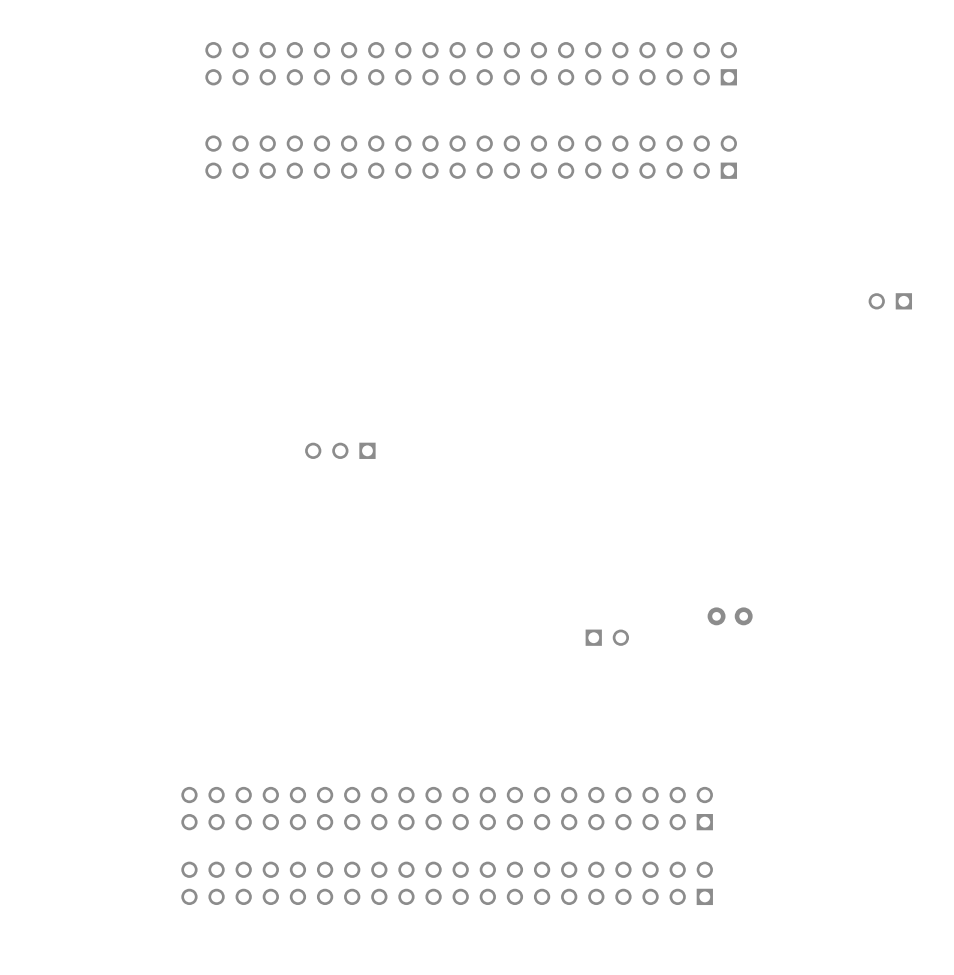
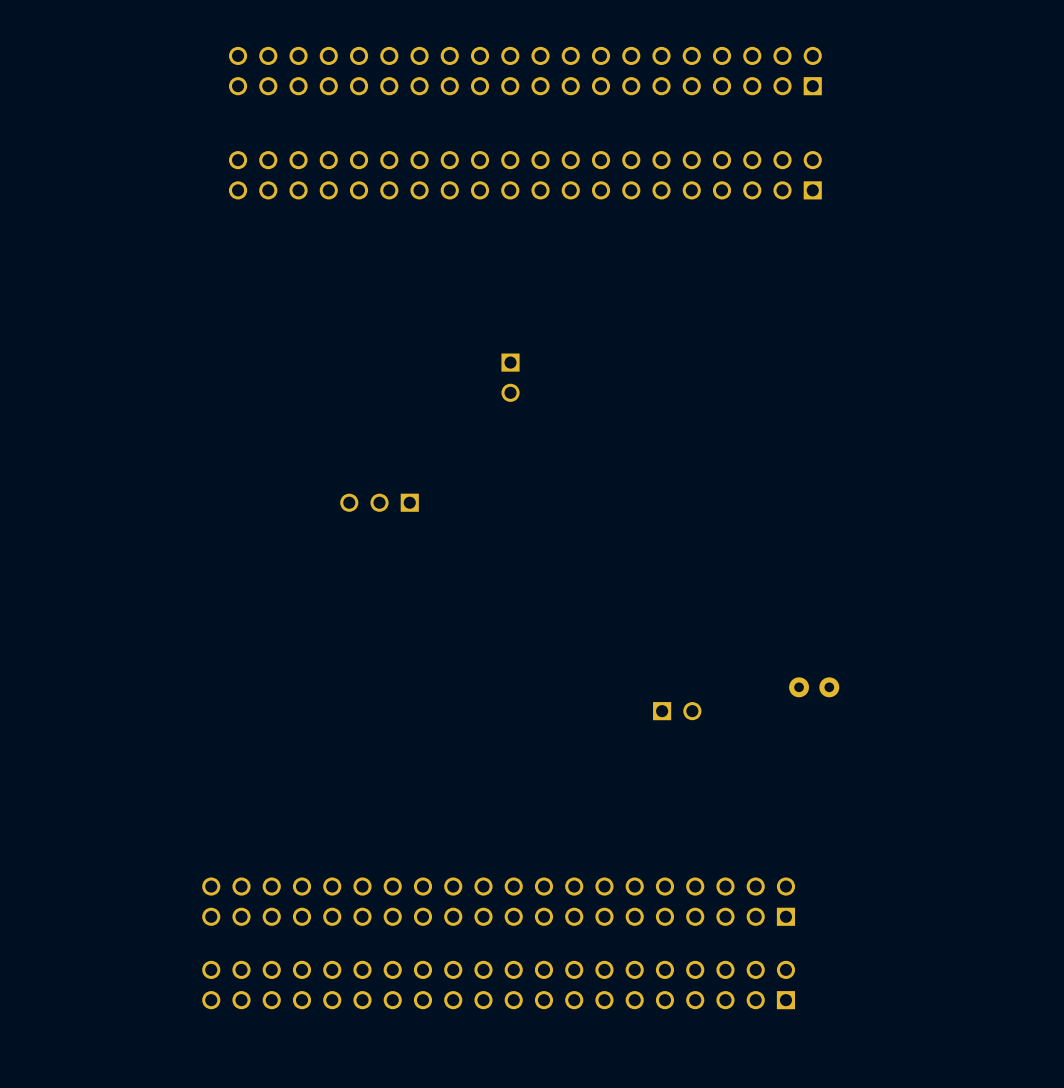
part: (890, 301) -> none
part: none -> (510, 377)

